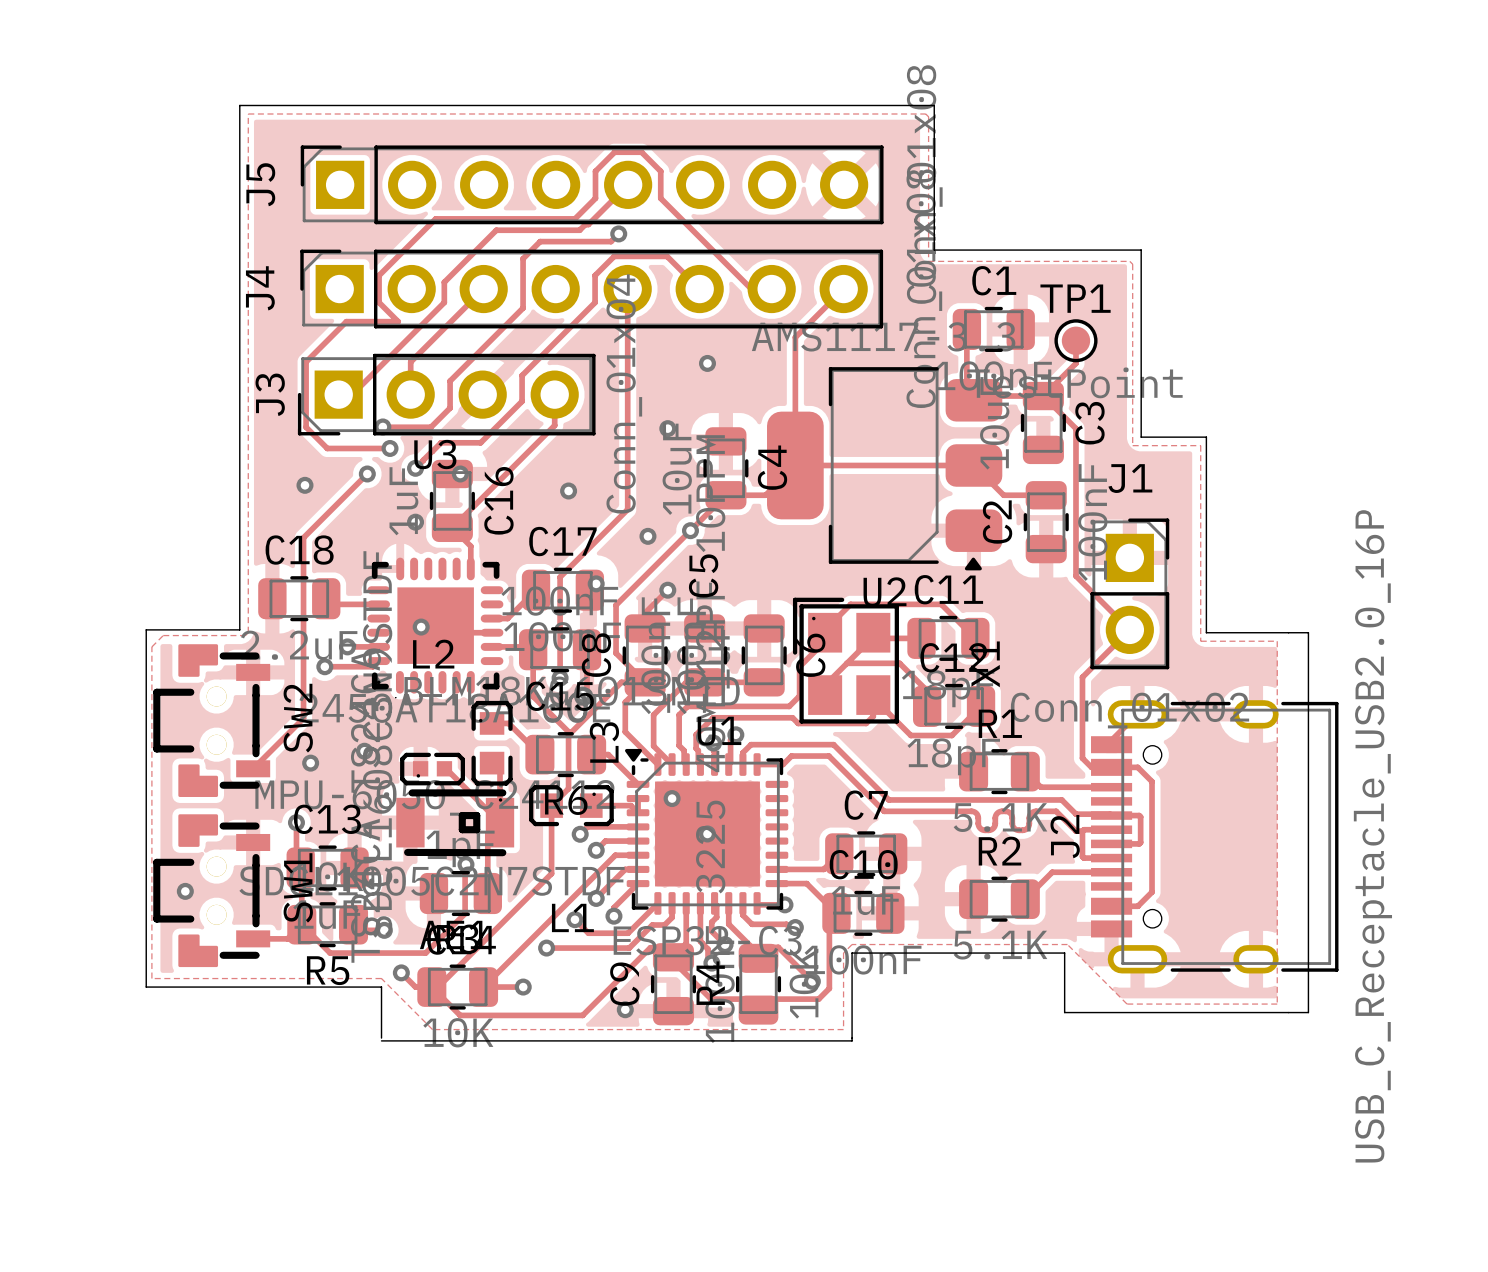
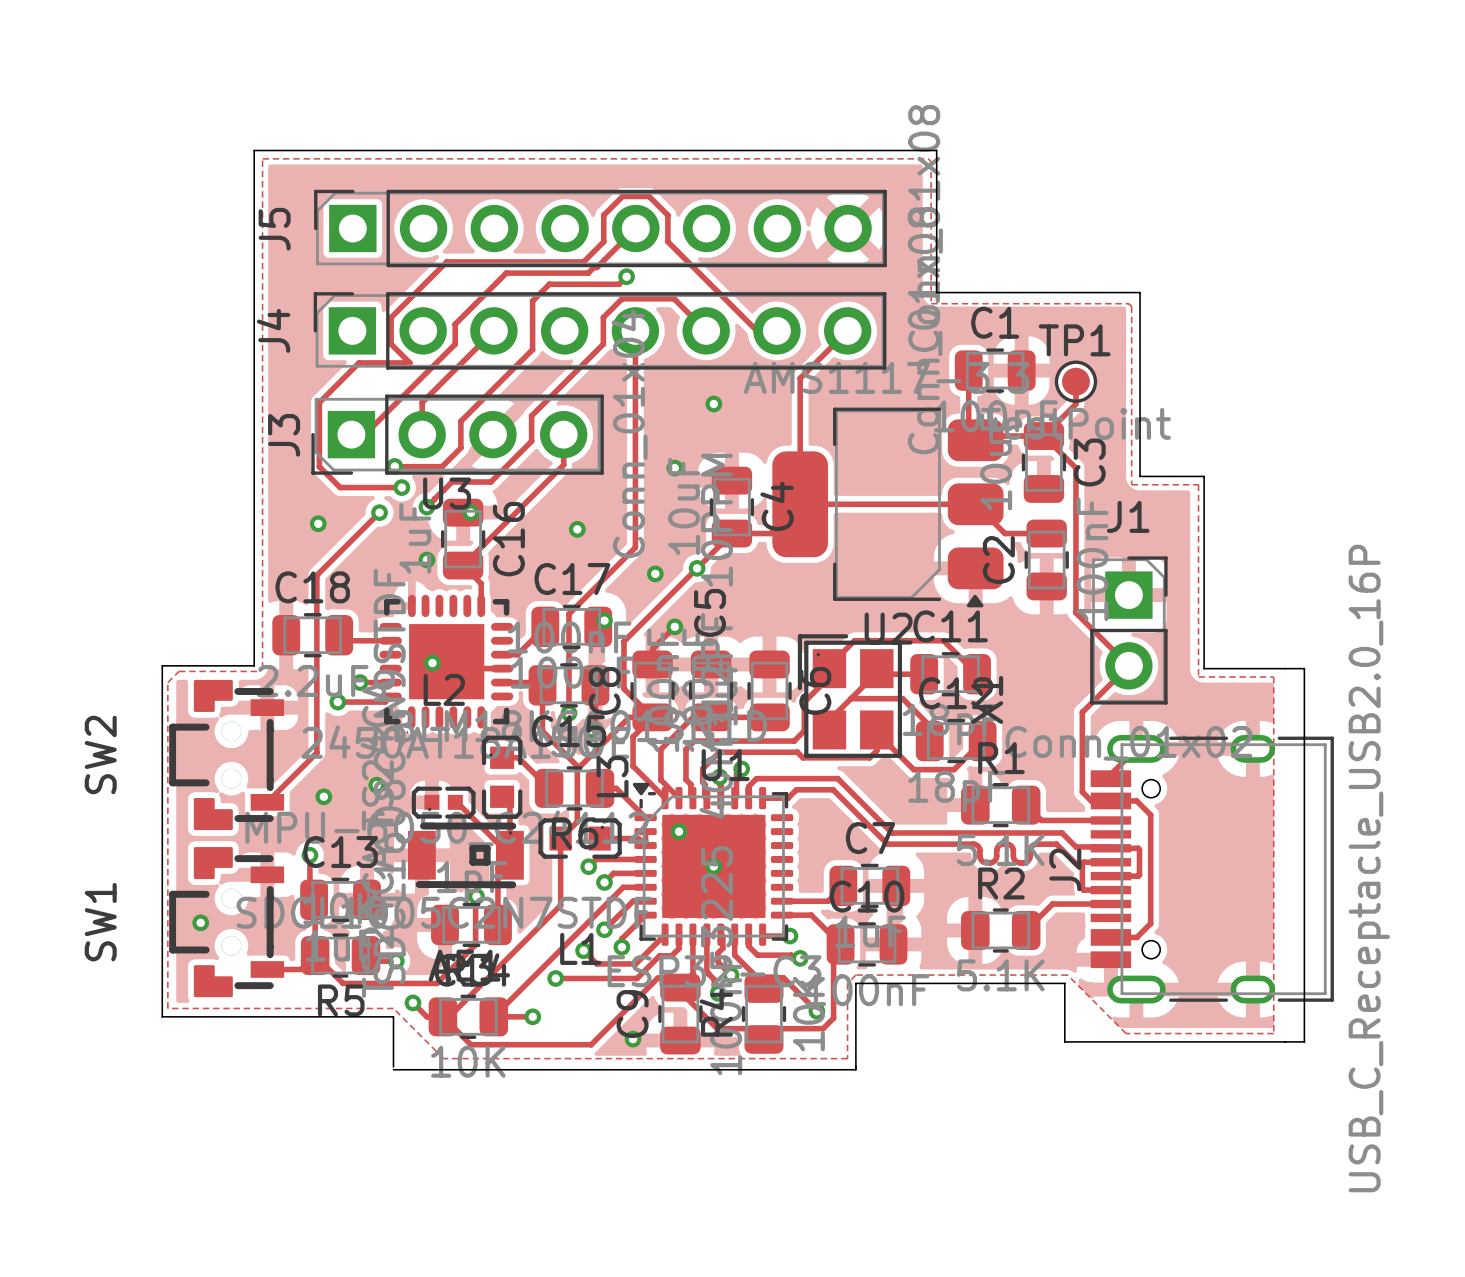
SW2 name position: SW2 (298, 718) -> SW2 (100, 754)
SW1 name position: SW1 (298, 887) -> SW1 (100, 922)

